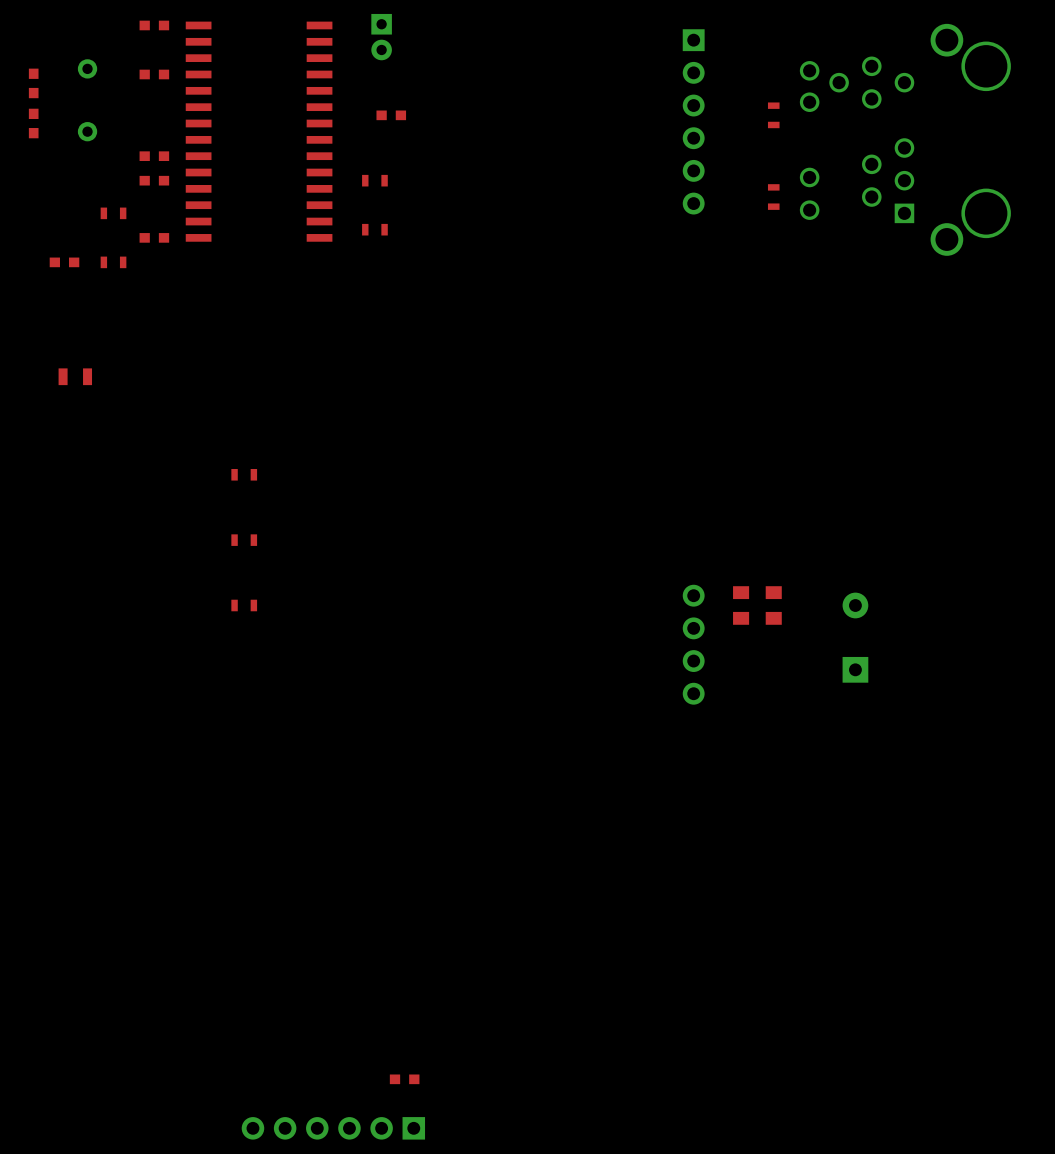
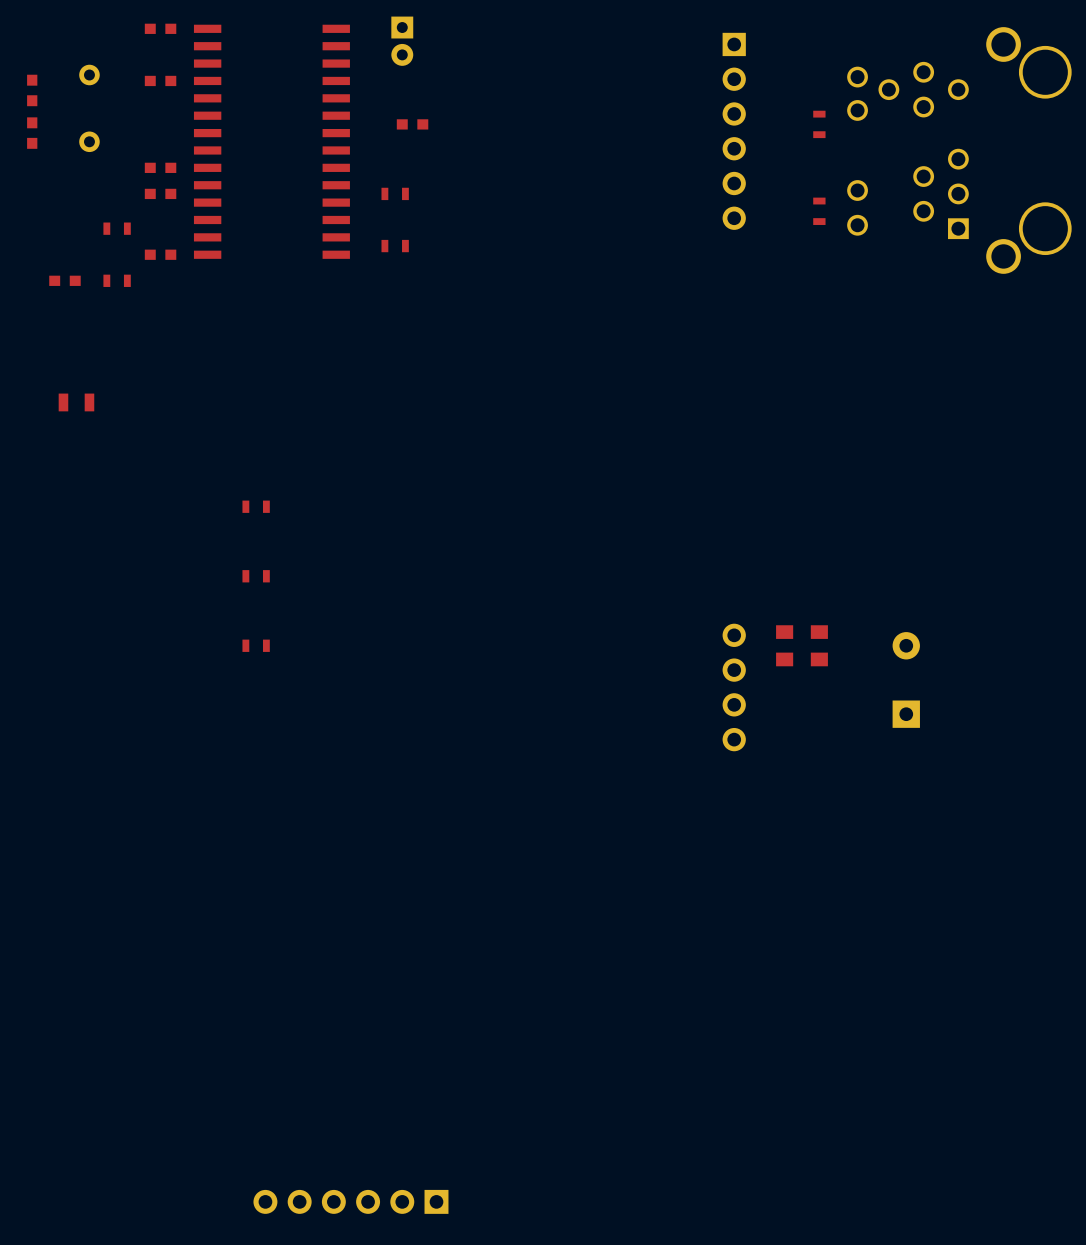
part: (404, 1079) -> none

